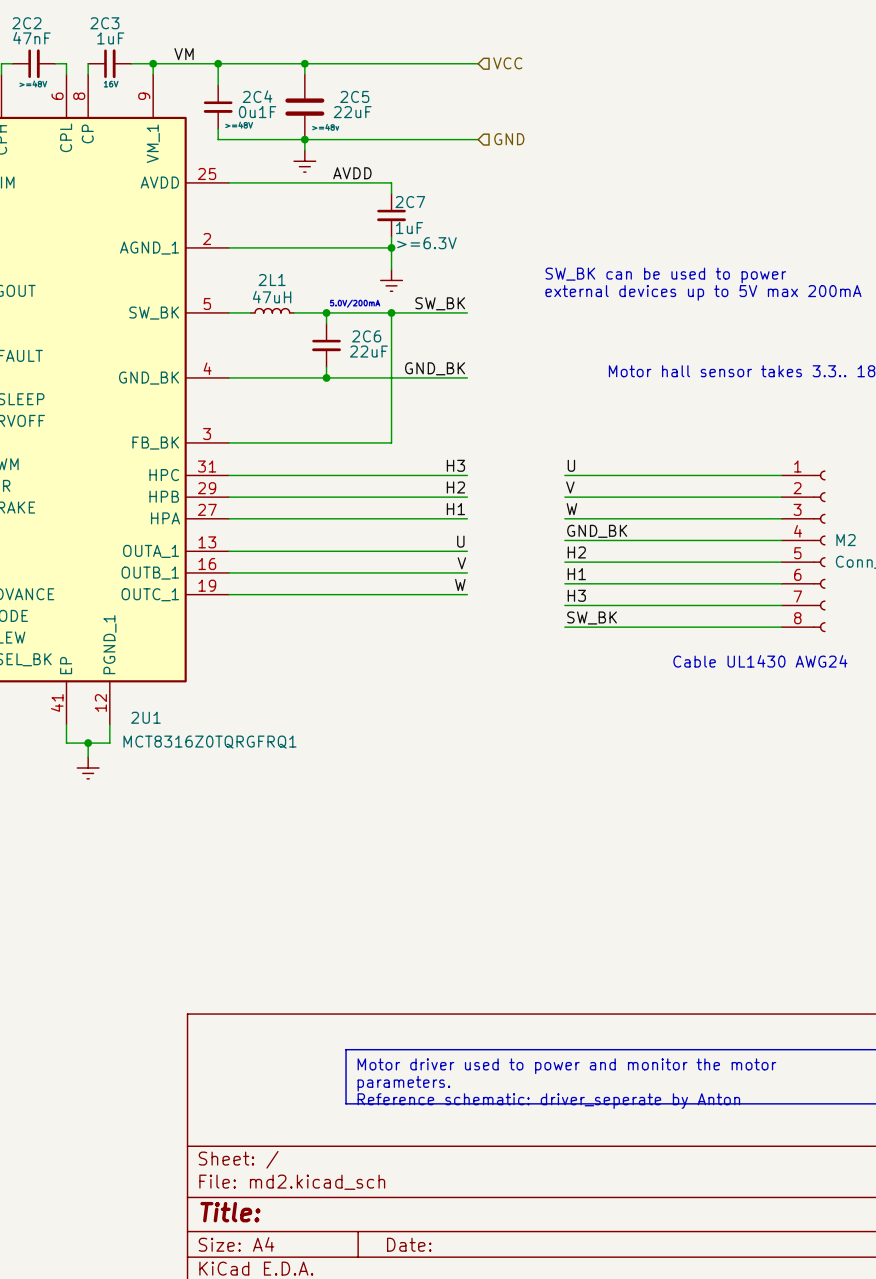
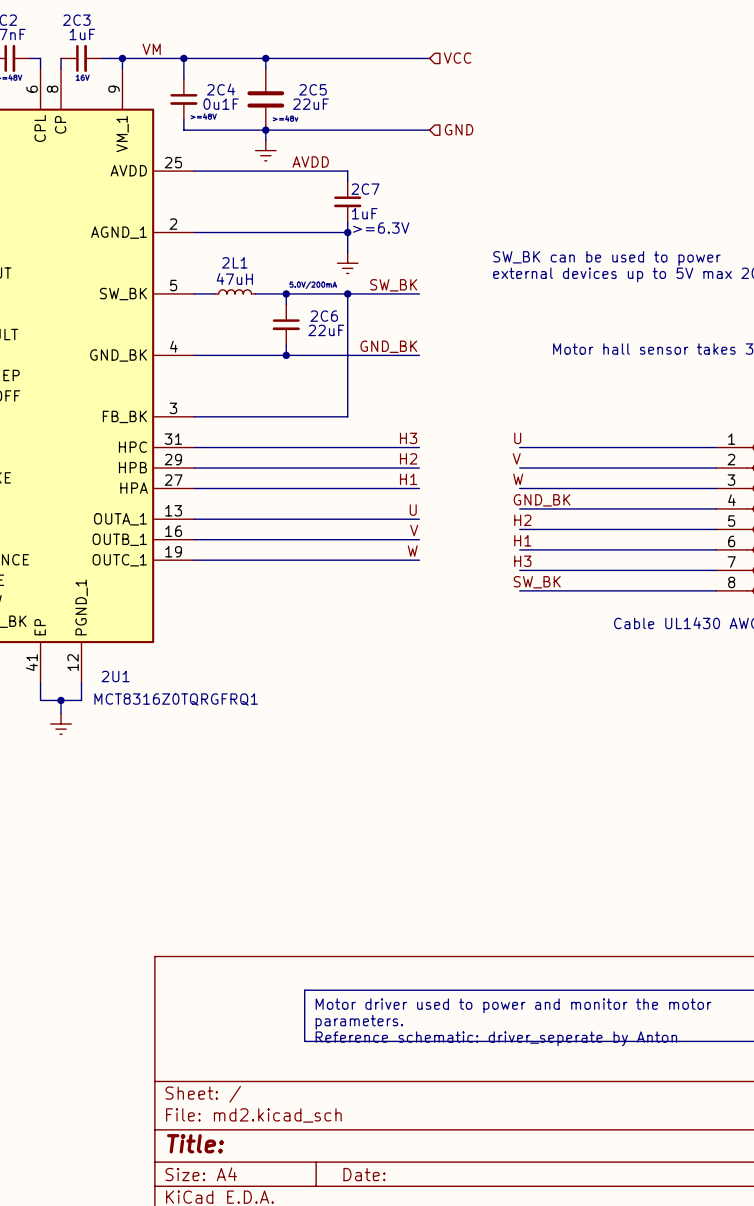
wire: (564, 475) (573, 475) -> none
wire: (564, 497) (573, 497) -> none
wire: (564, 518) (573, 518) -> none
wire: (564, 540) (573, 540) -> none
wire: (564, 562) (573, 562) -> none
wire: (564, 583) (573, 583) -> none
wire: (564, 605) (573, 605) -> none
wire: (564, 627) (573, 627) -> none

